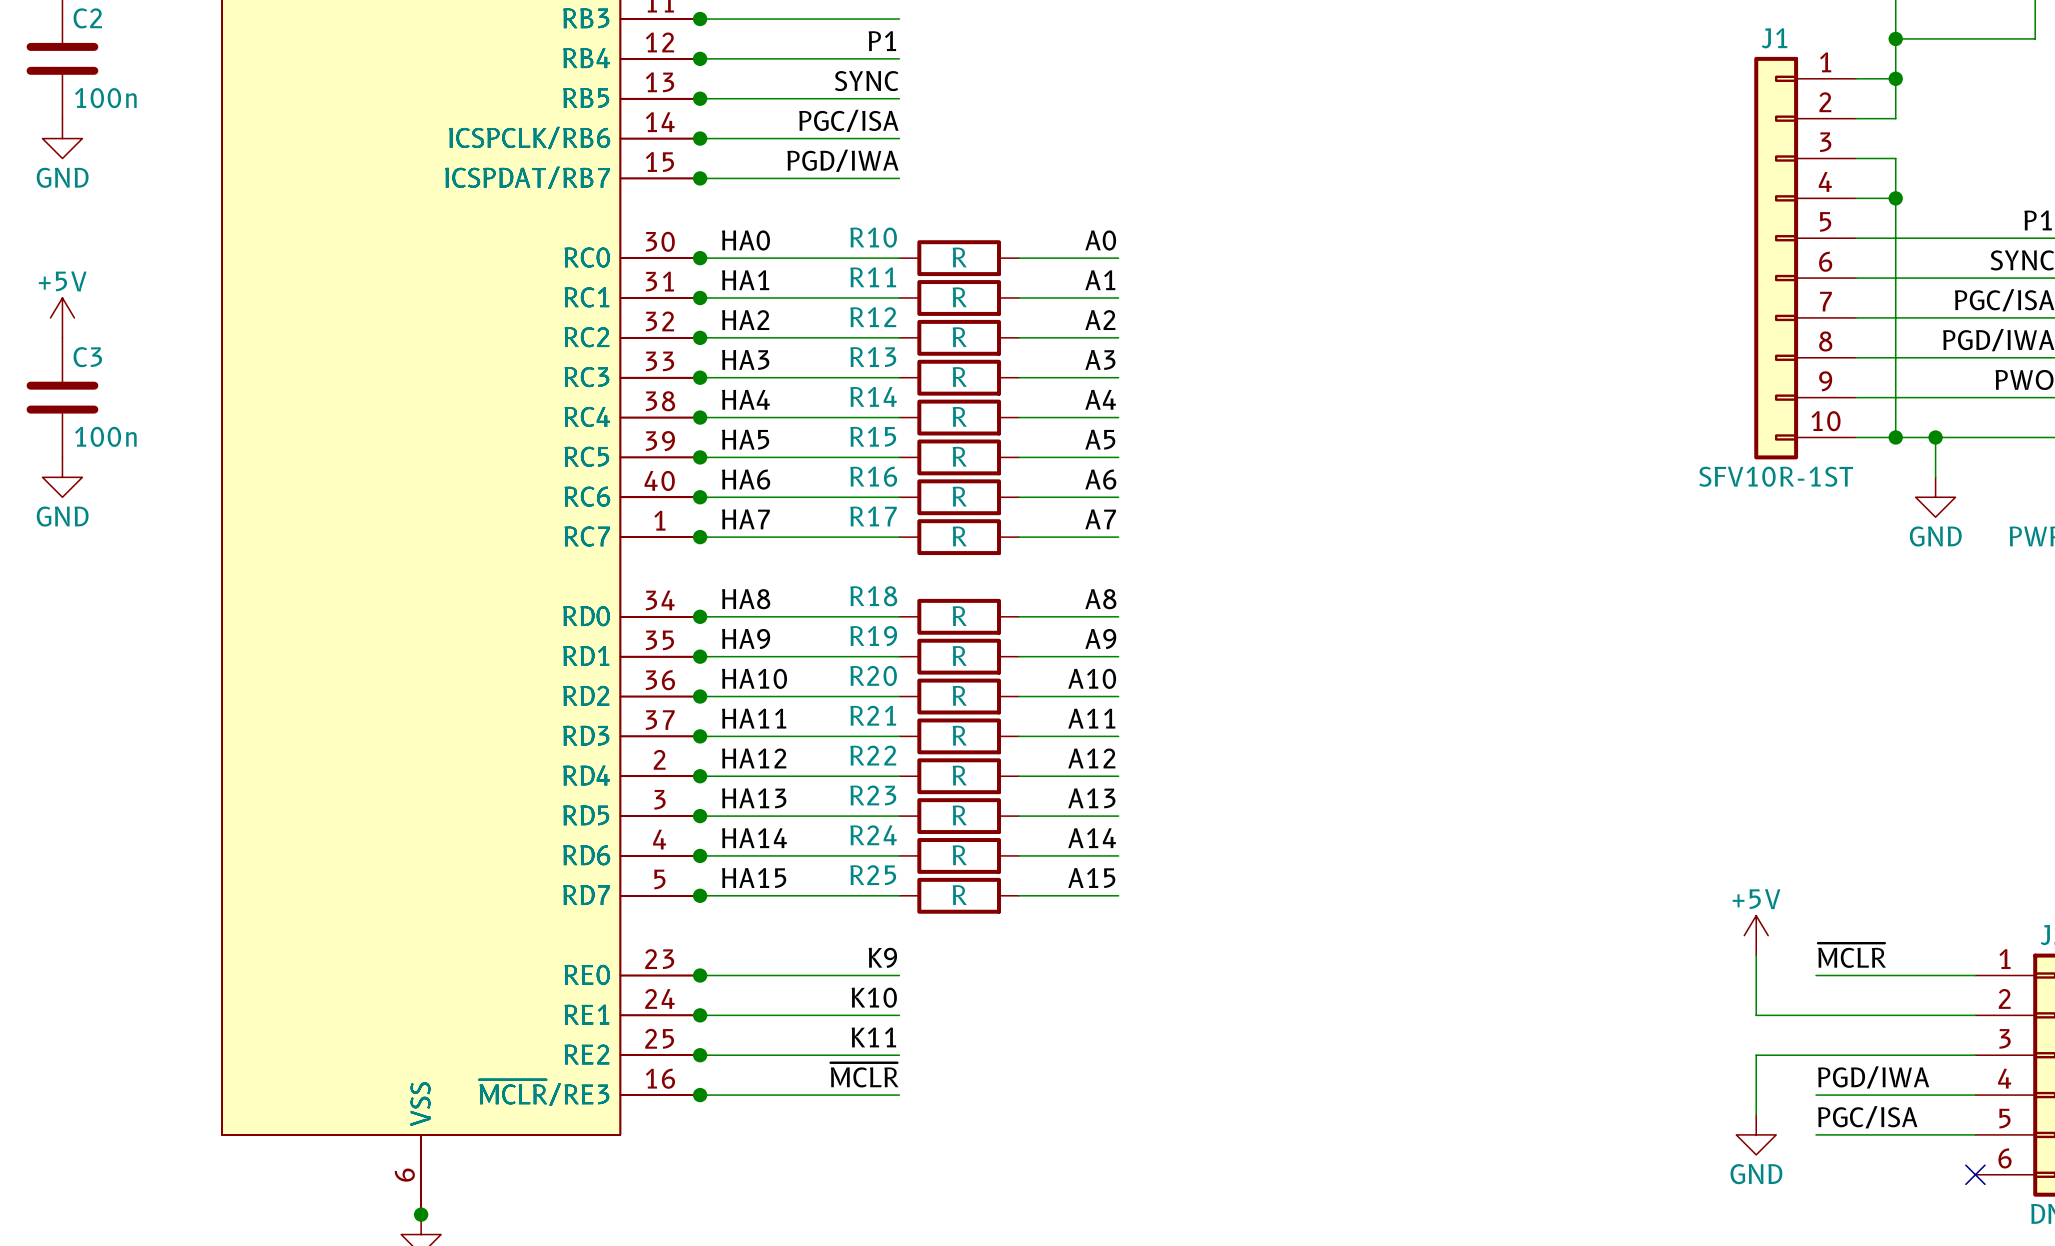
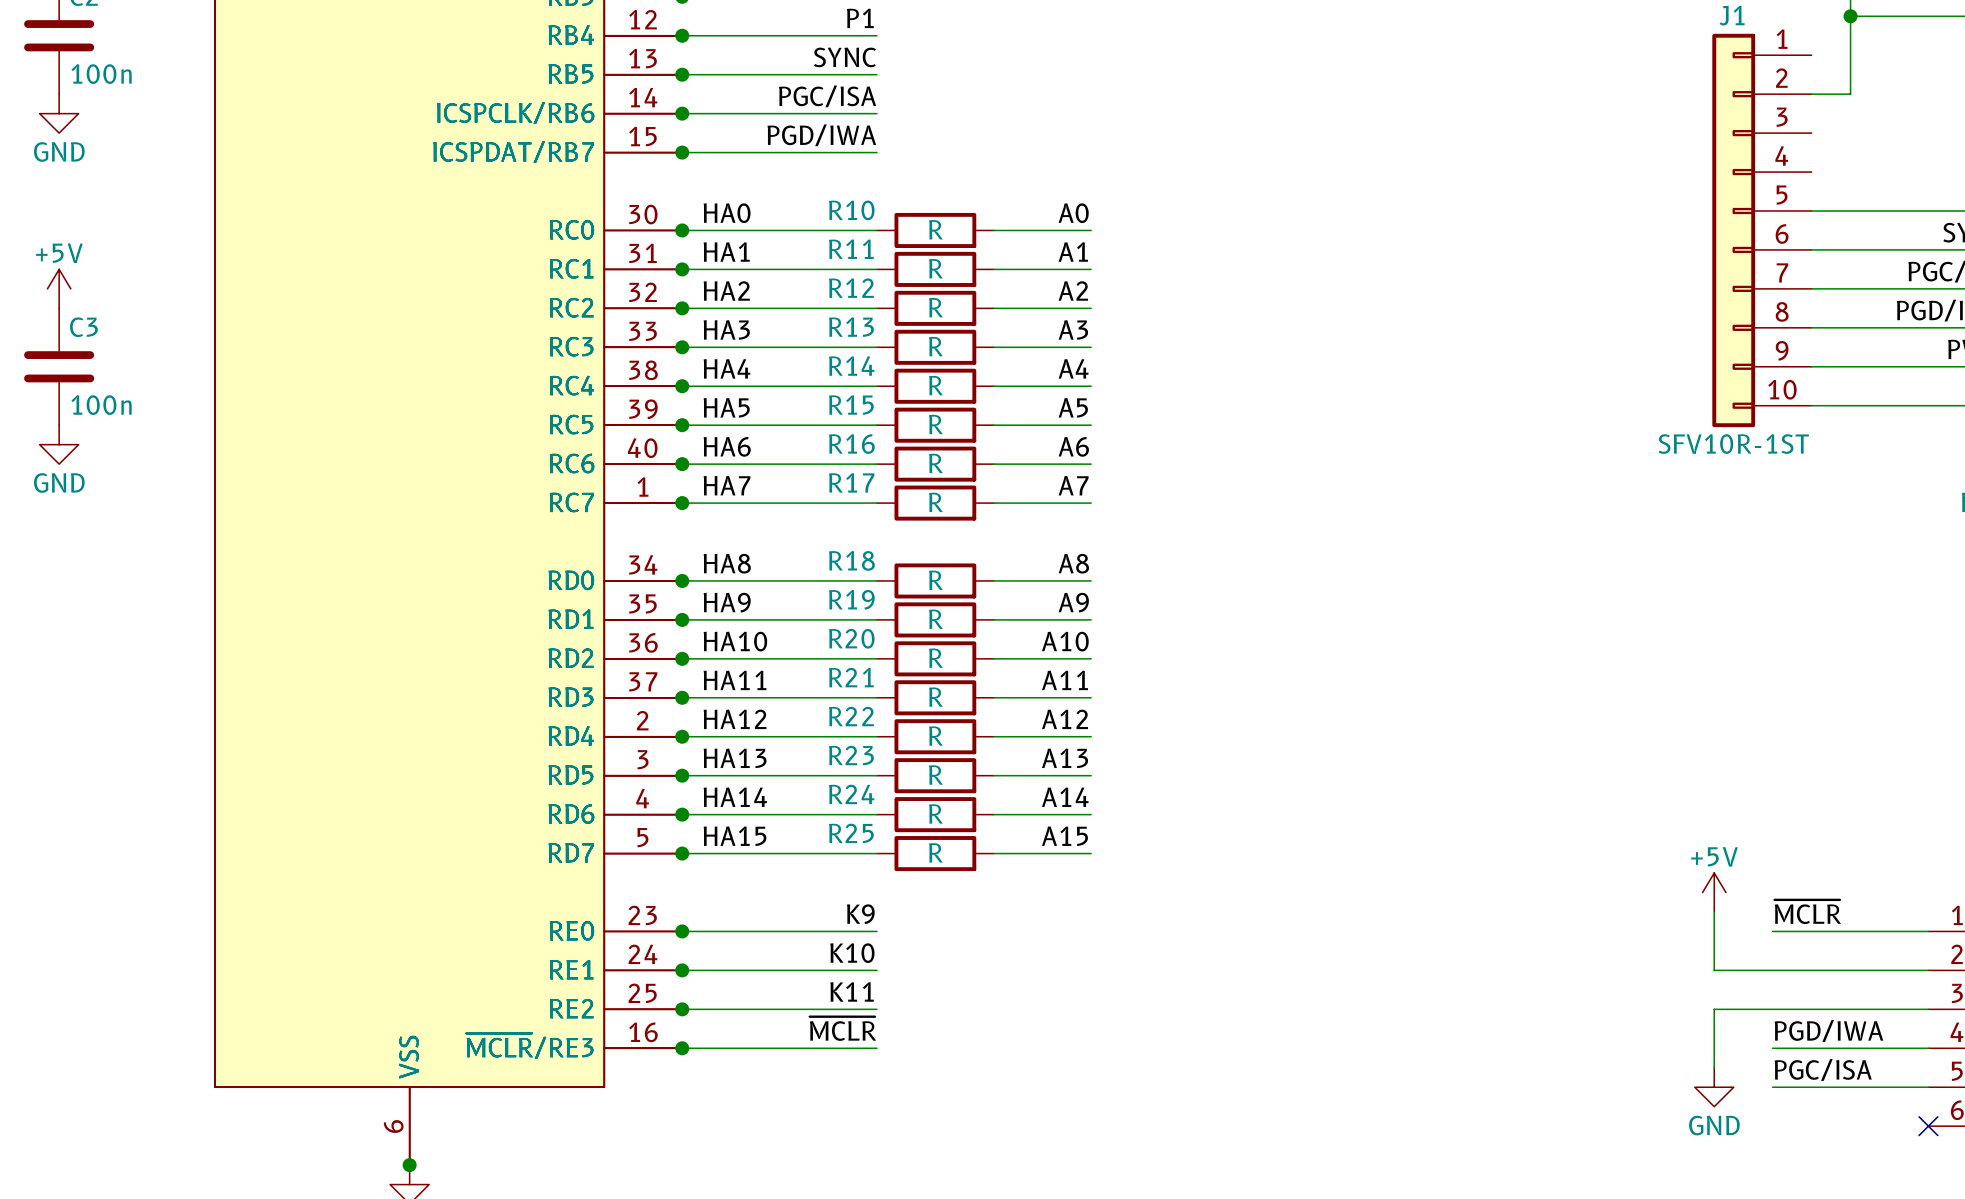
wire: (1855, 78) (1895, 78) -> none
junction: (1895, 78) -> none
wire: (1855, 158) (1895, 158) (1895, 437) -> none
wire: (1855, 198) (1895, 198) -> none
junction: (1895, 198) -> none
junction: (1895, 437) -> none
wire: (1935, 437) (1935, 477) -> none
junction: (1935, 437) -> none
power symbol: GND (1935, 497) -> none

